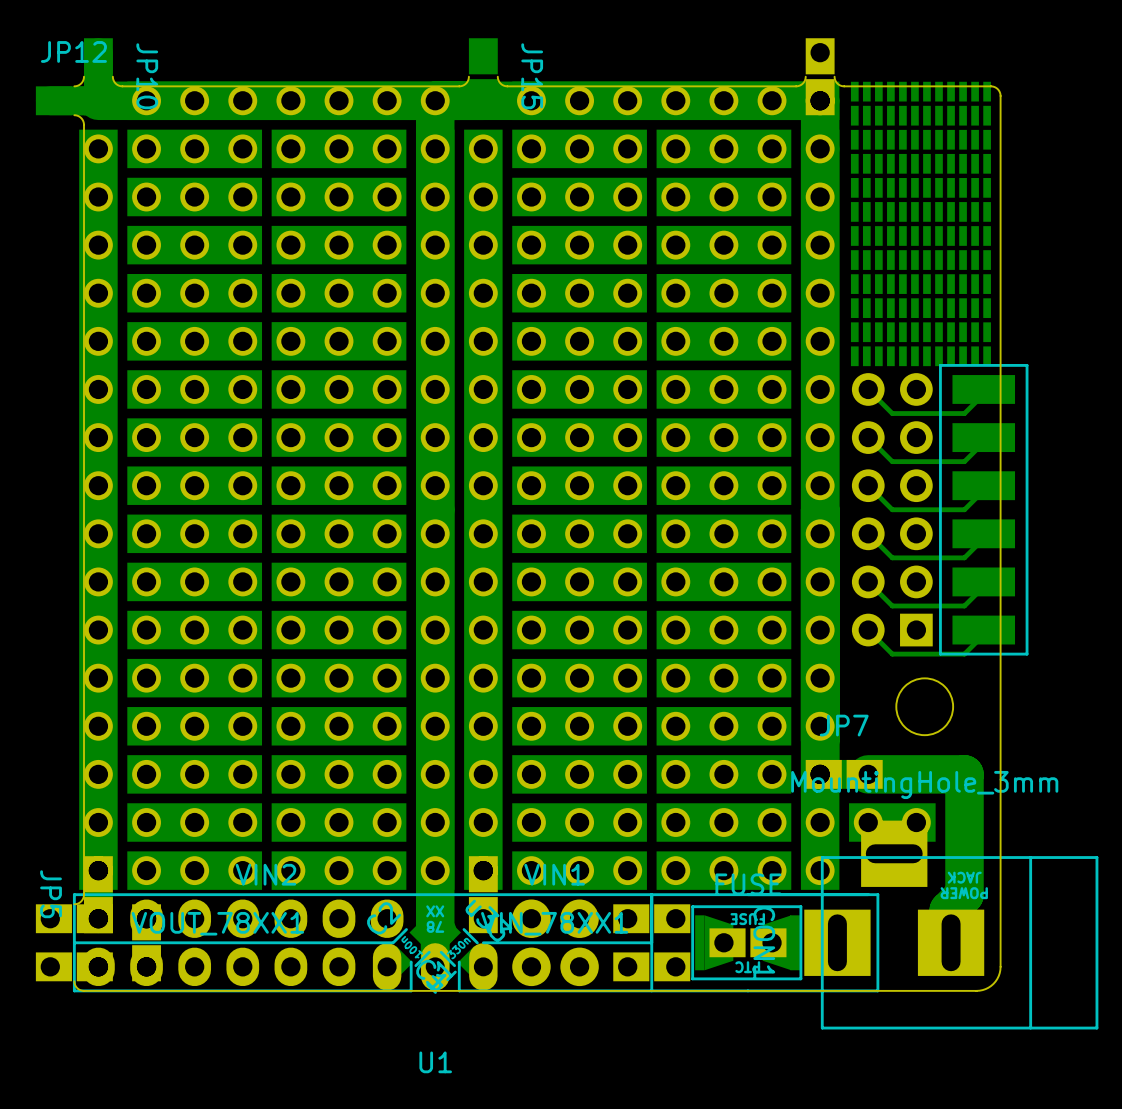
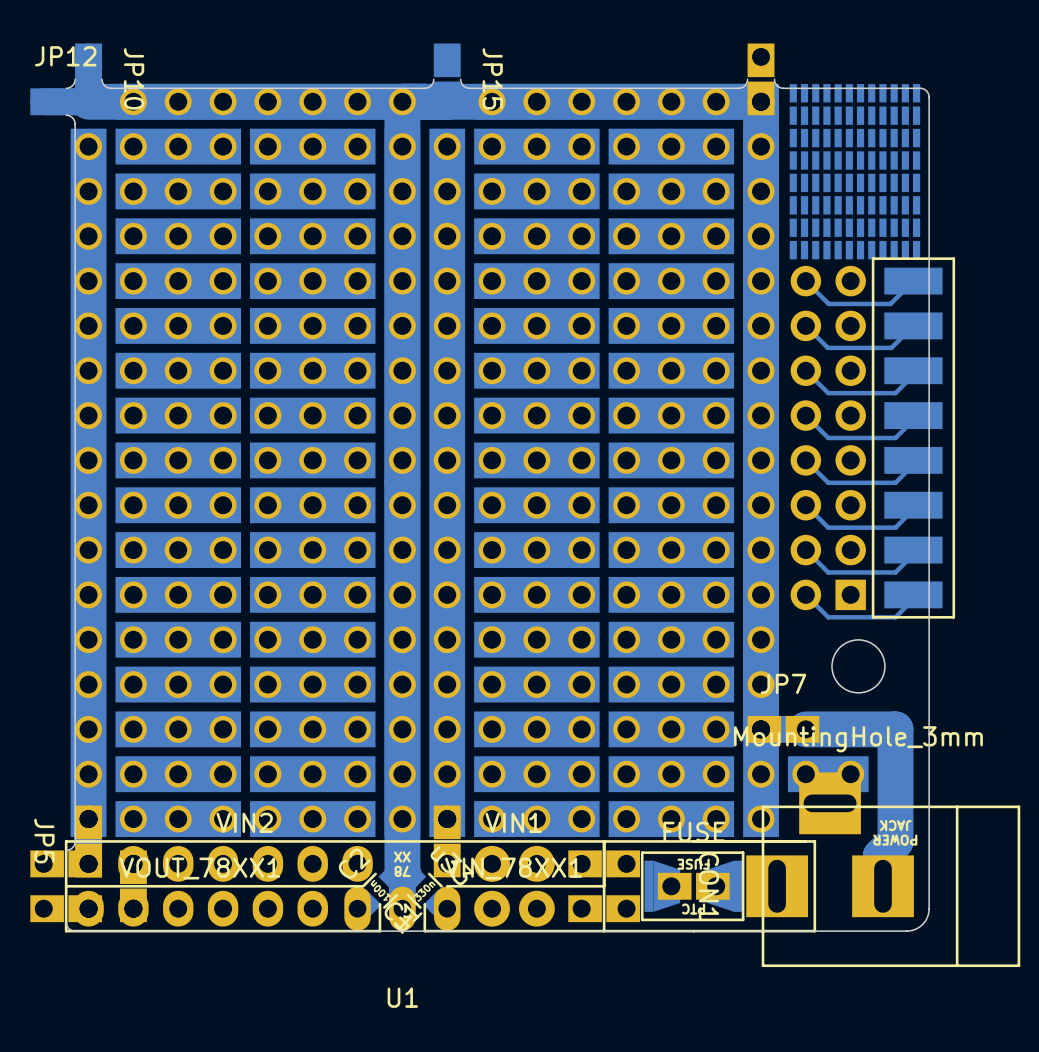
track: none -> (897, 281) (913, 281) (890, 303) (828, 303) (805, 281)
part: (920, 320) -> none
track: none -> (897, 325) (913, 325) (891, 347) (827, 347) (805, 325)
part: none -> (828, 437)
part: none -> (913, 437)
part: (983, 509) -> none

